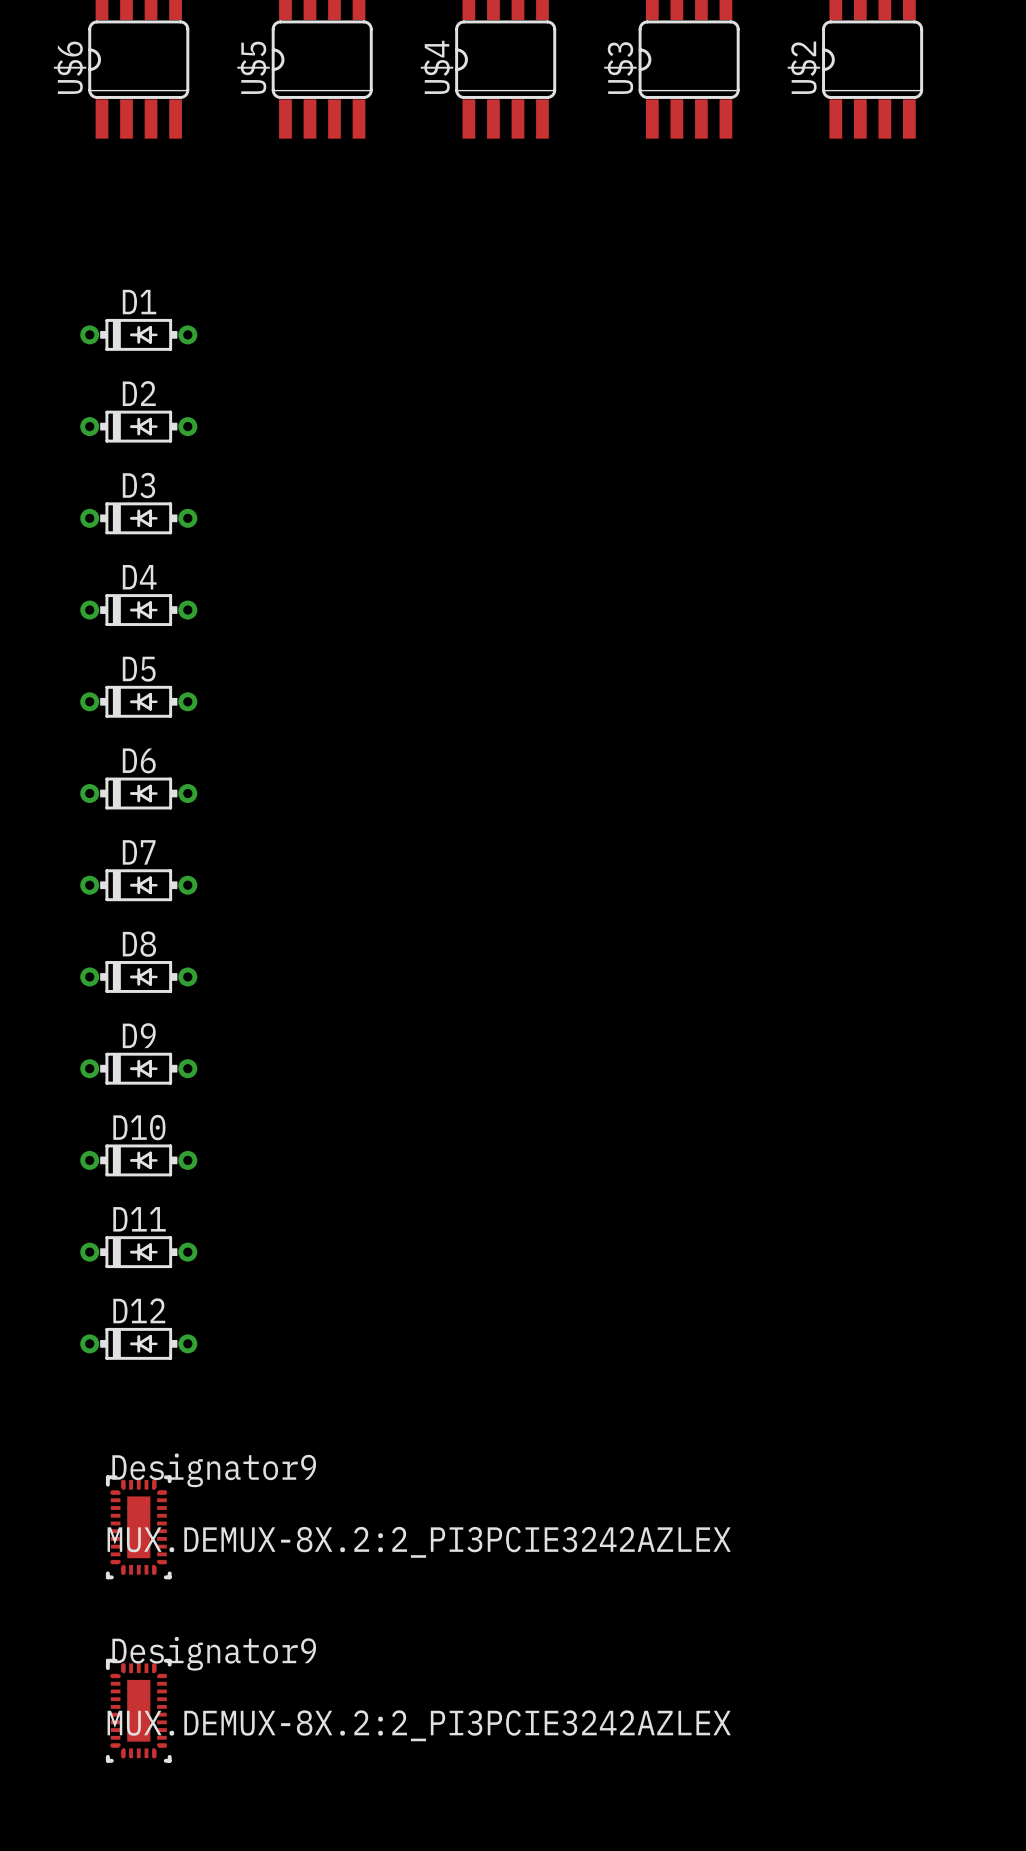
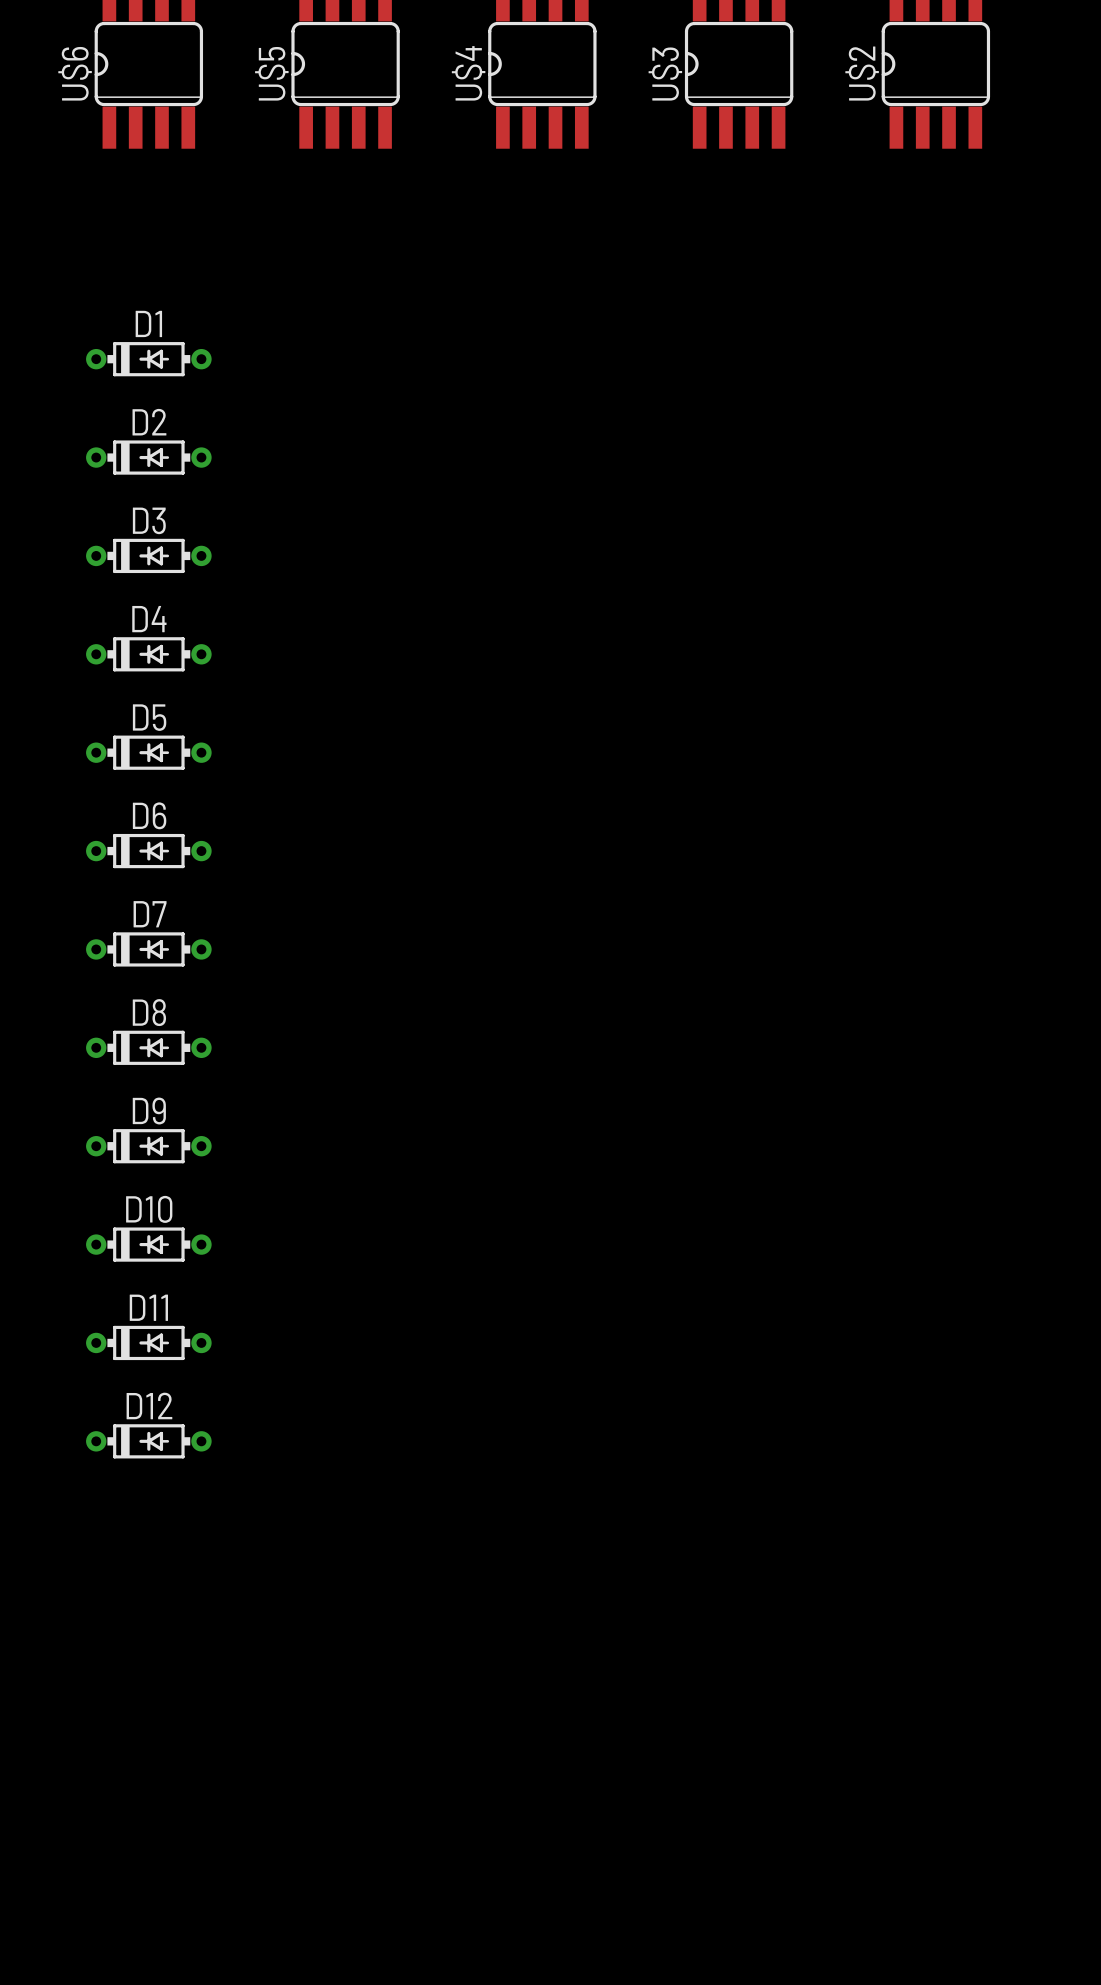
part: MUX.DEMUX-8X.2:2_PI3PCIE3242AZLEX (138, 1527) -> none
part: MUX.DEMUX-8X.2:2_PI3PCIE3242AZLEX (138, 1710) -> none

